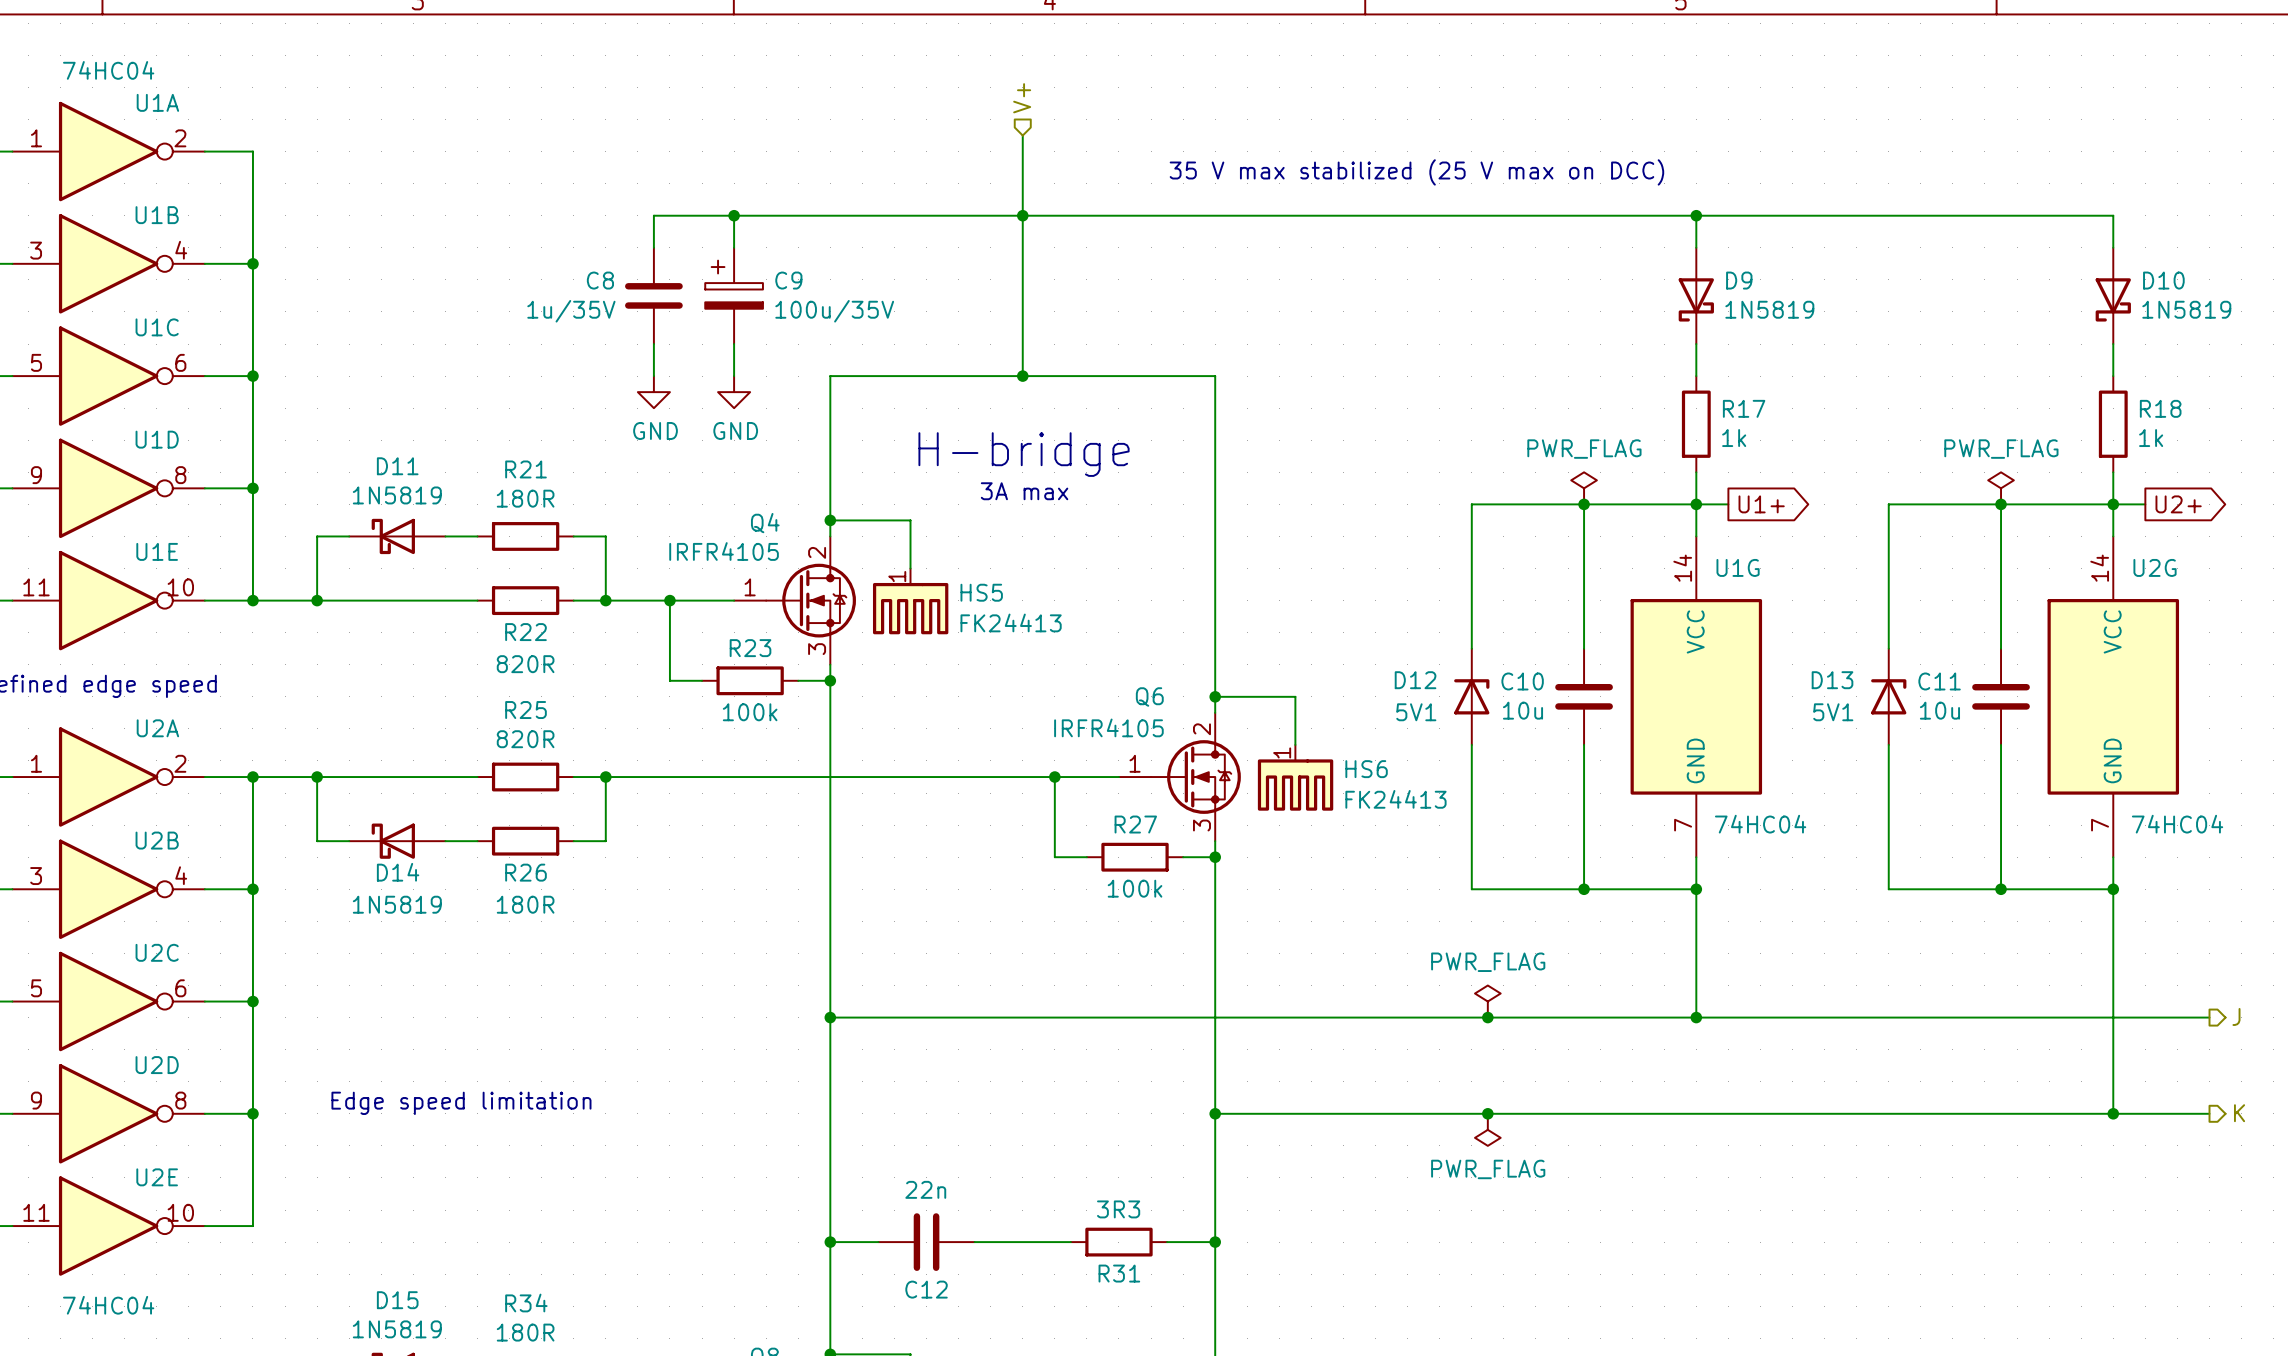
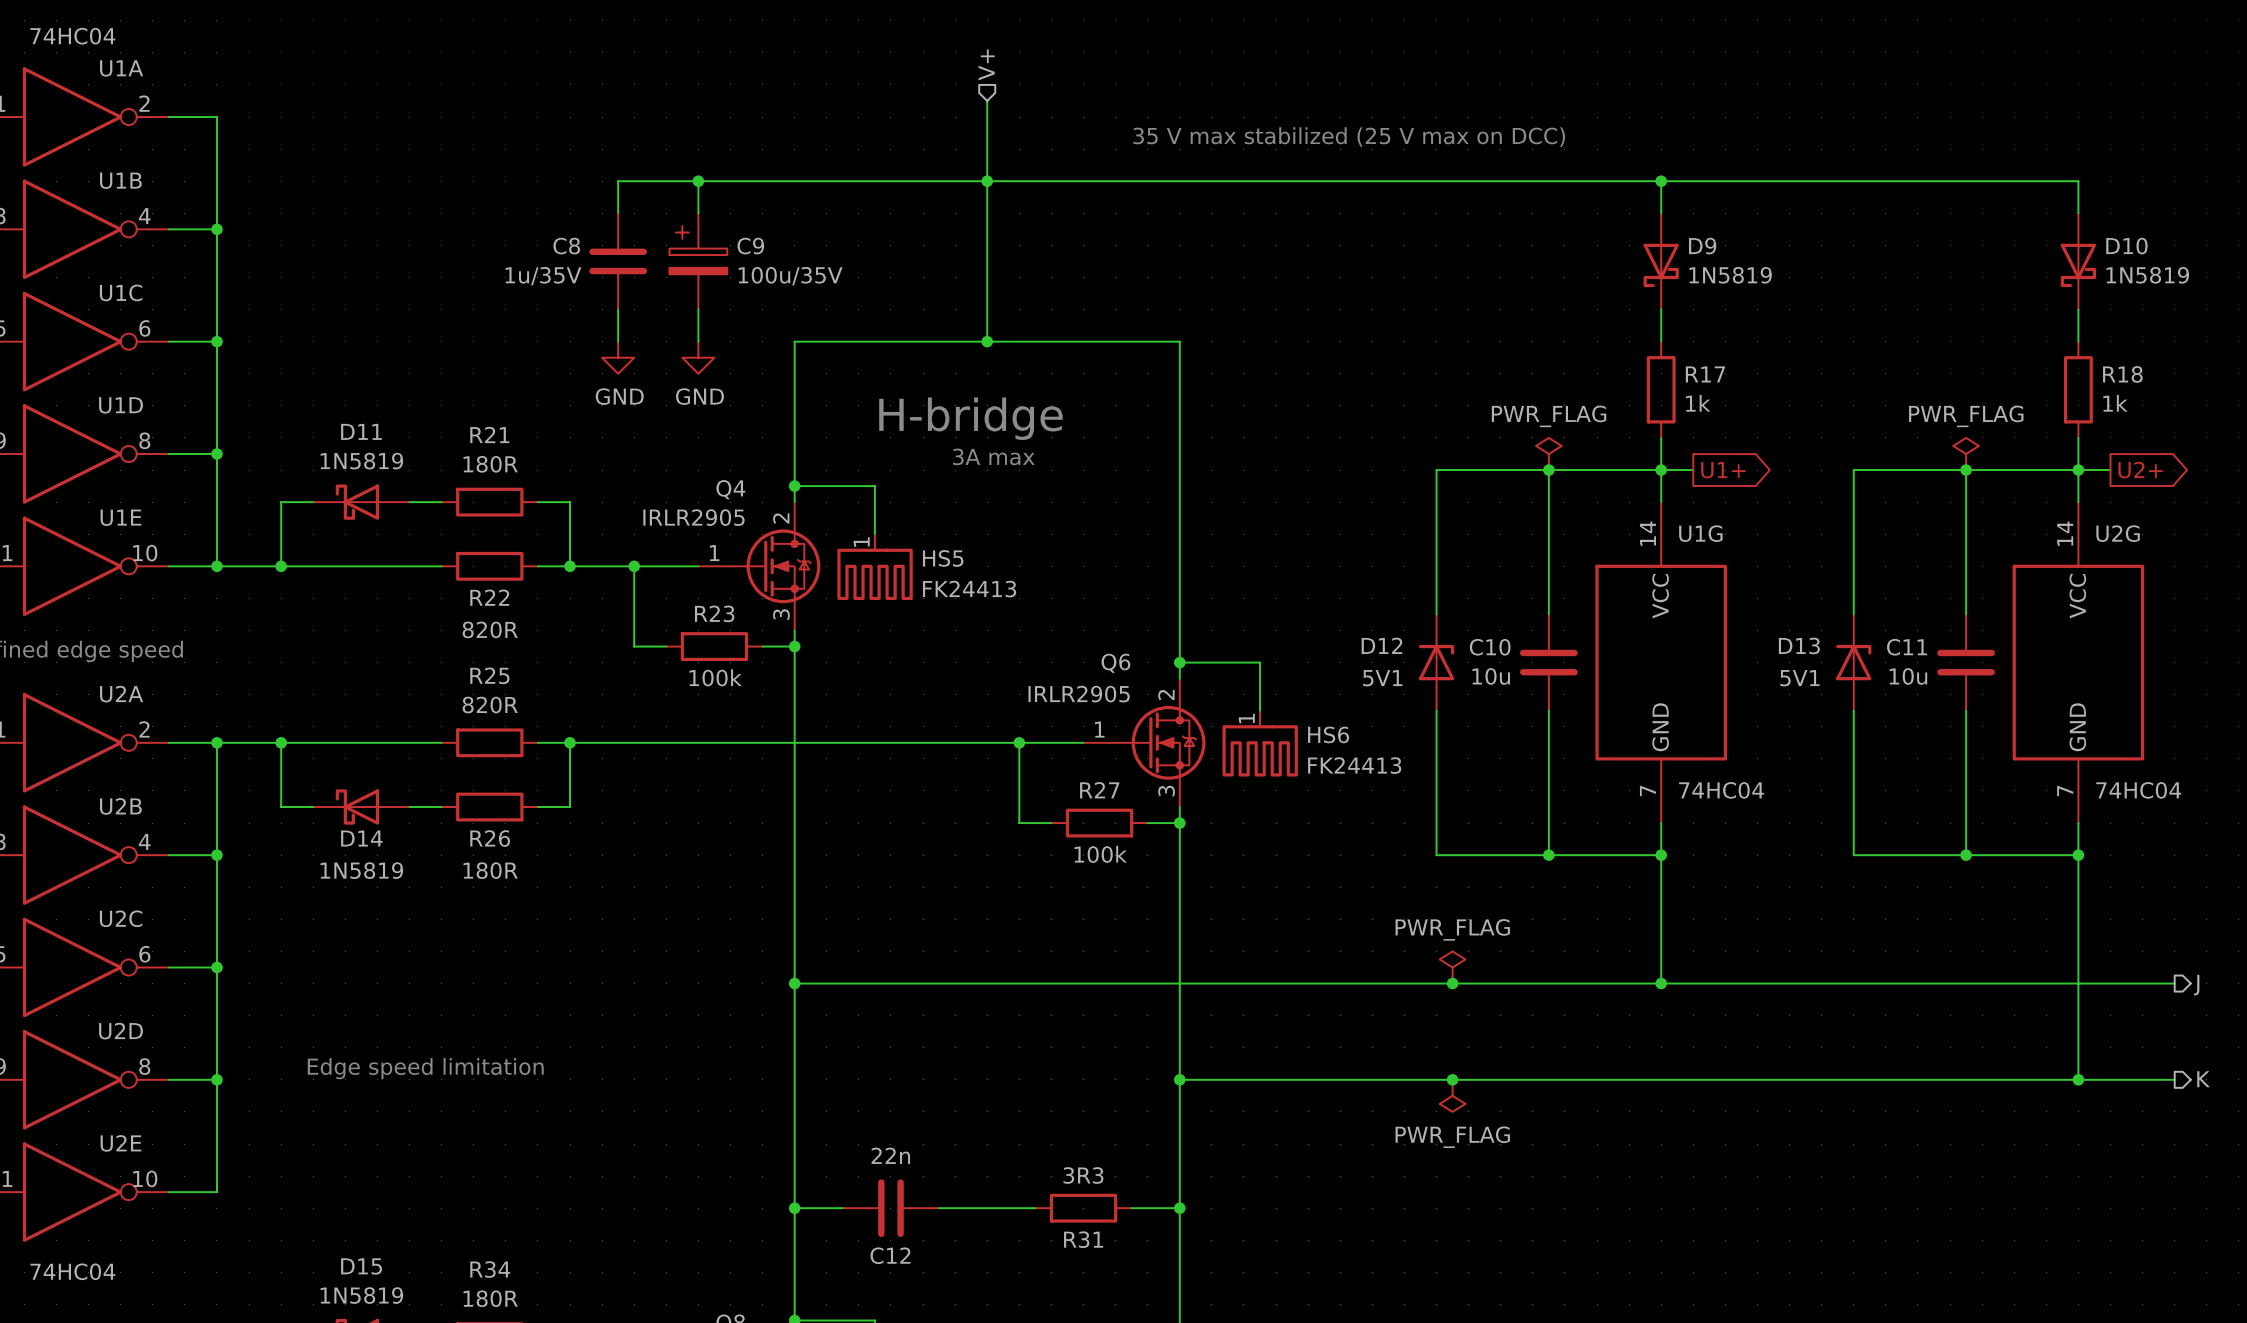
Q4 value: IRFR4105 (724, 551) -> IRLR2905 (693, 517)
Q6 value: IRFR4105 (1108, 727) -> IRLR2905 (1079, 694)

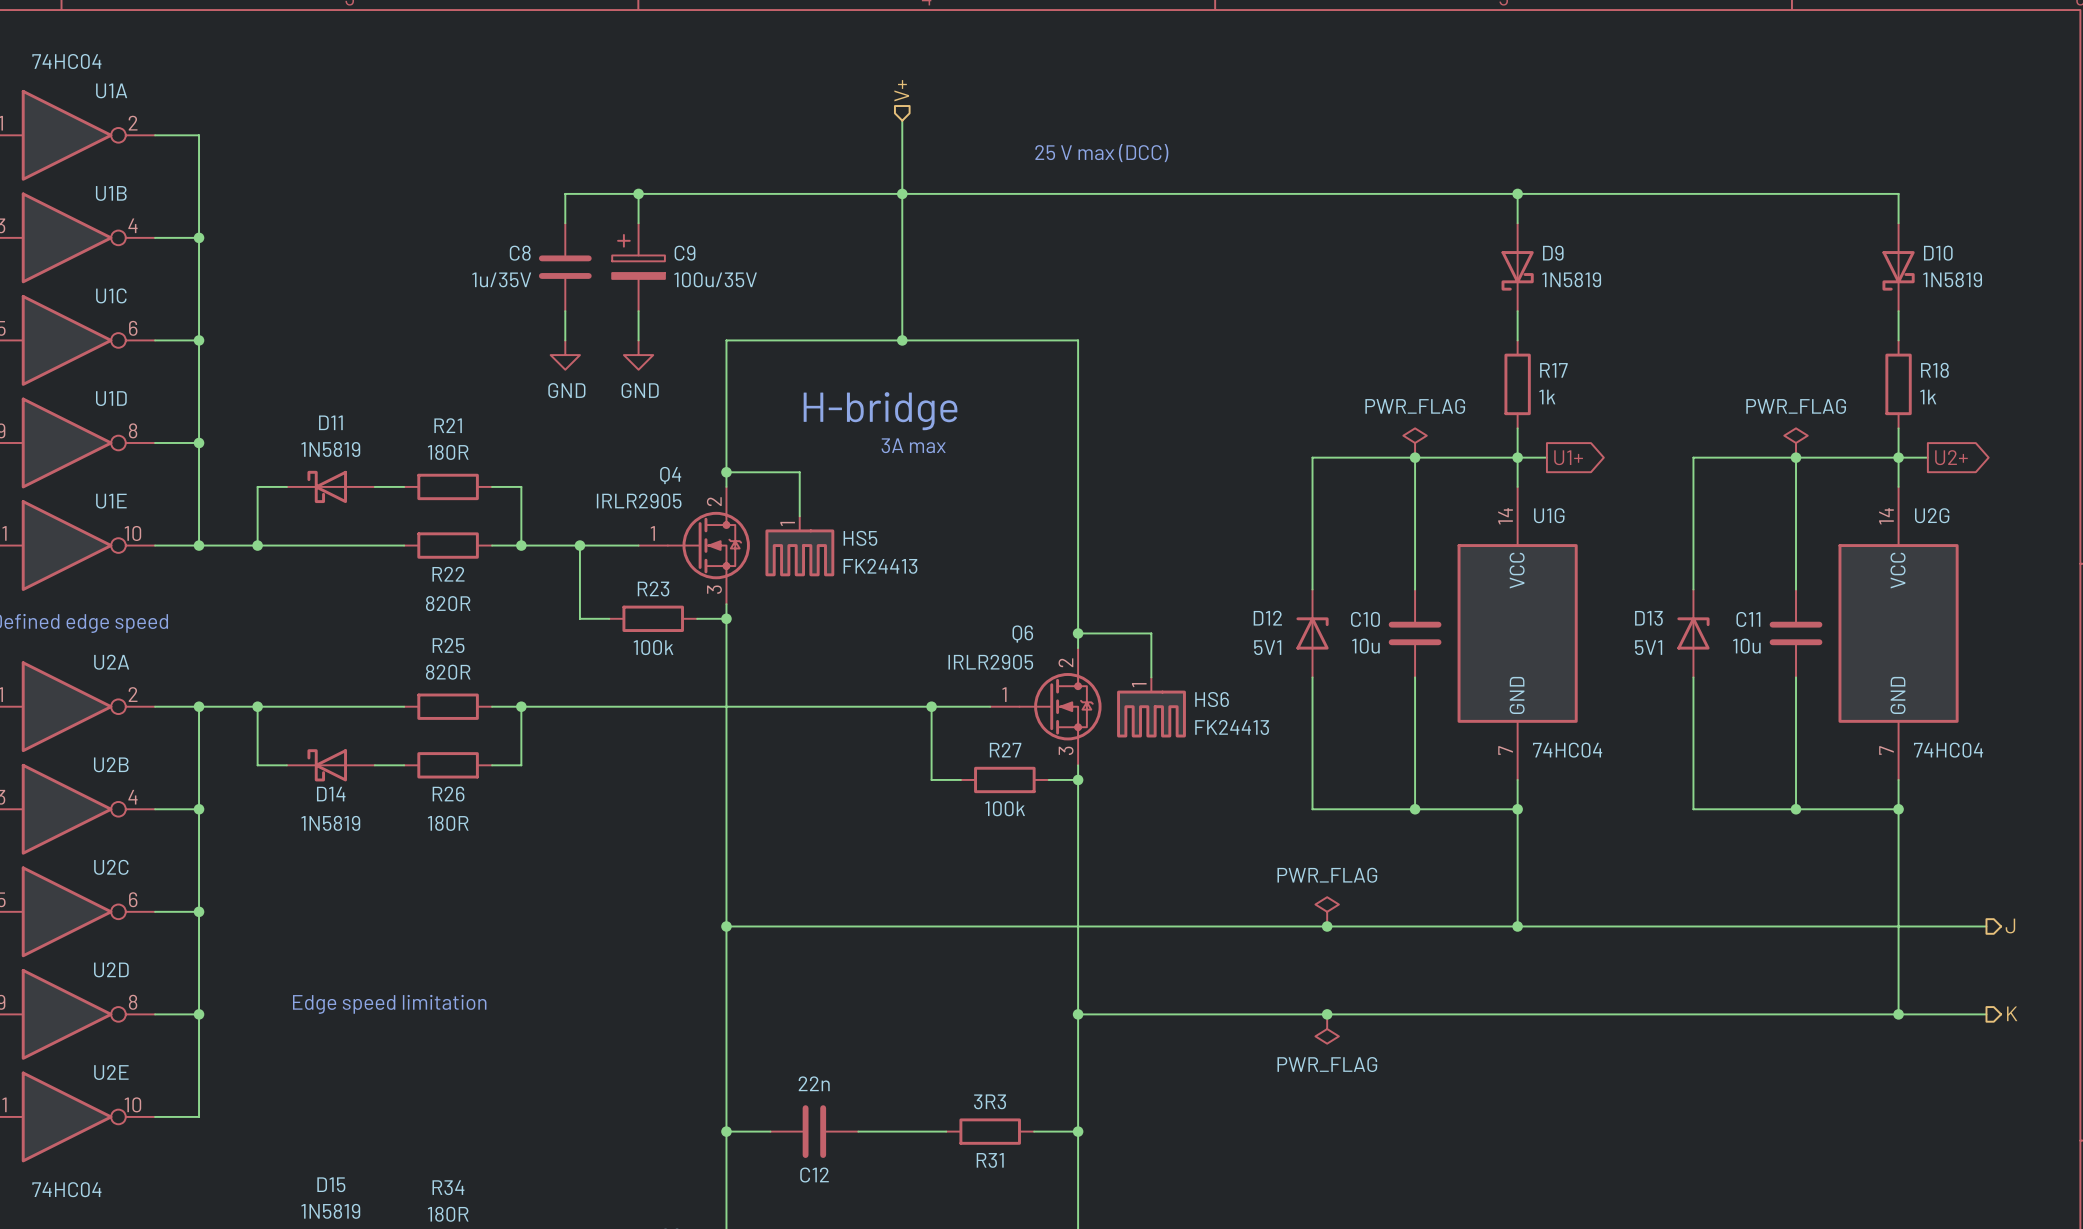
text: 35 V max stabilized (25 V max on DCC) (1349, 137) -> 25 V max (DCC) (1101, 153)

